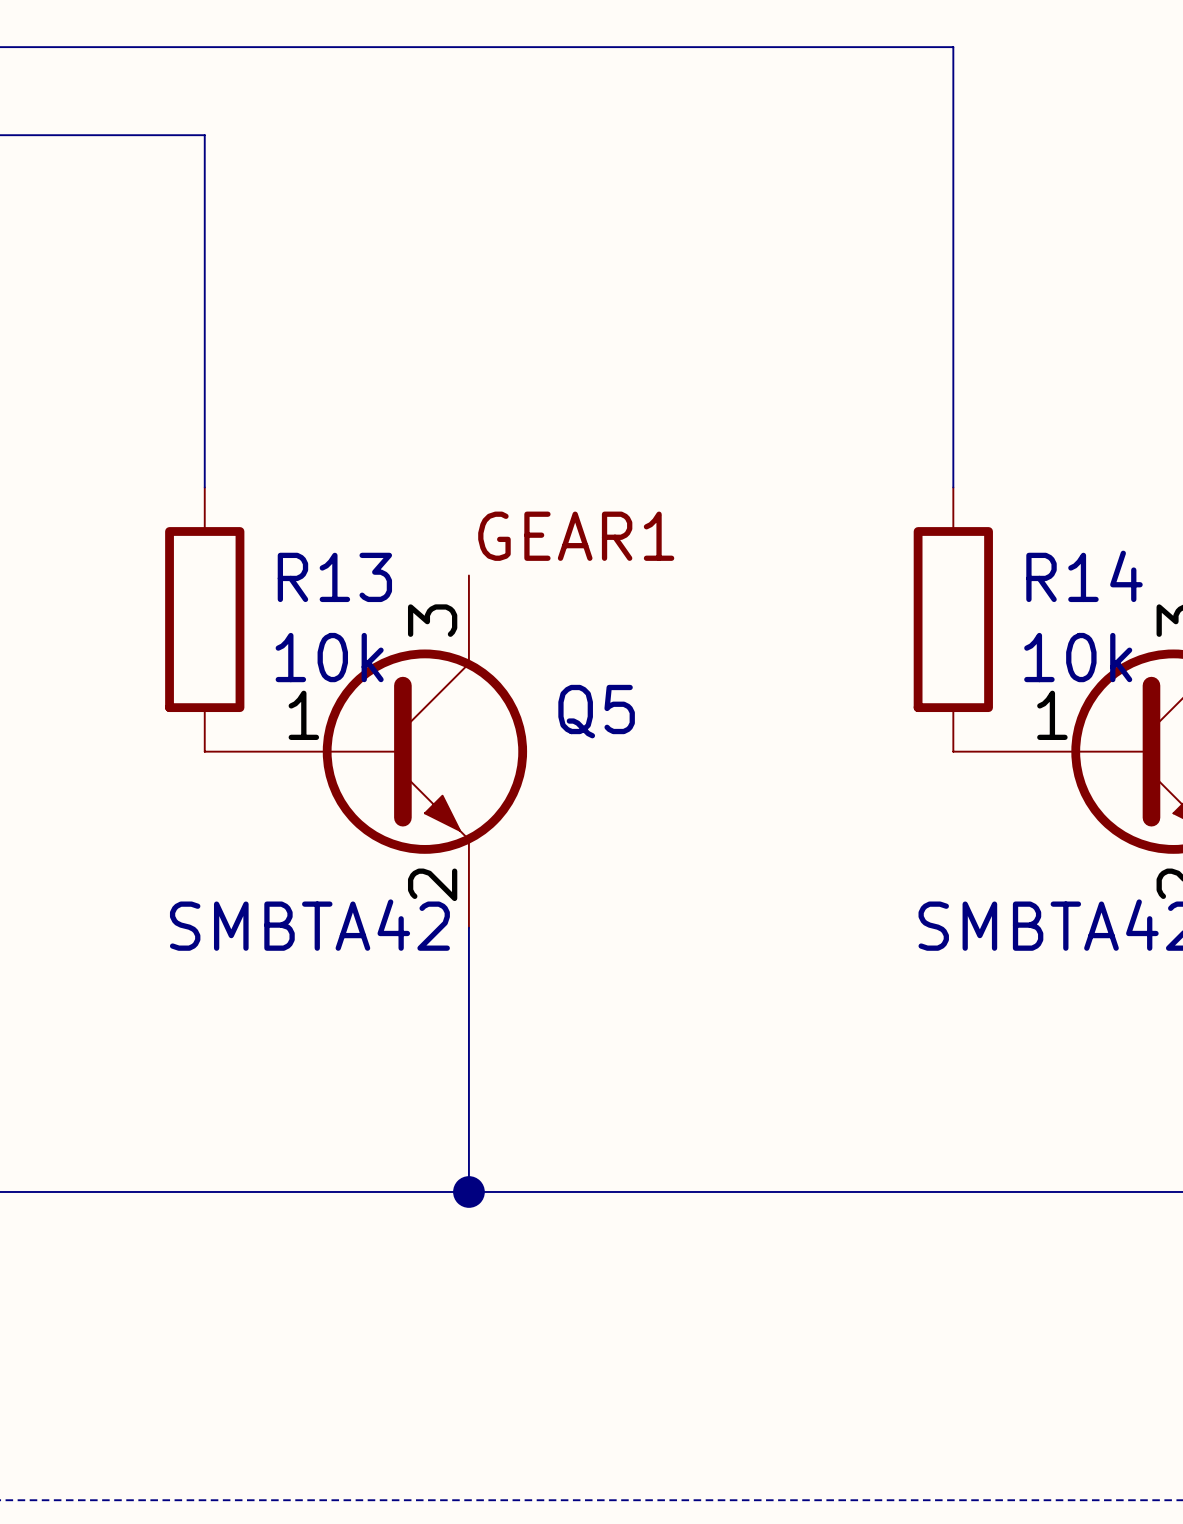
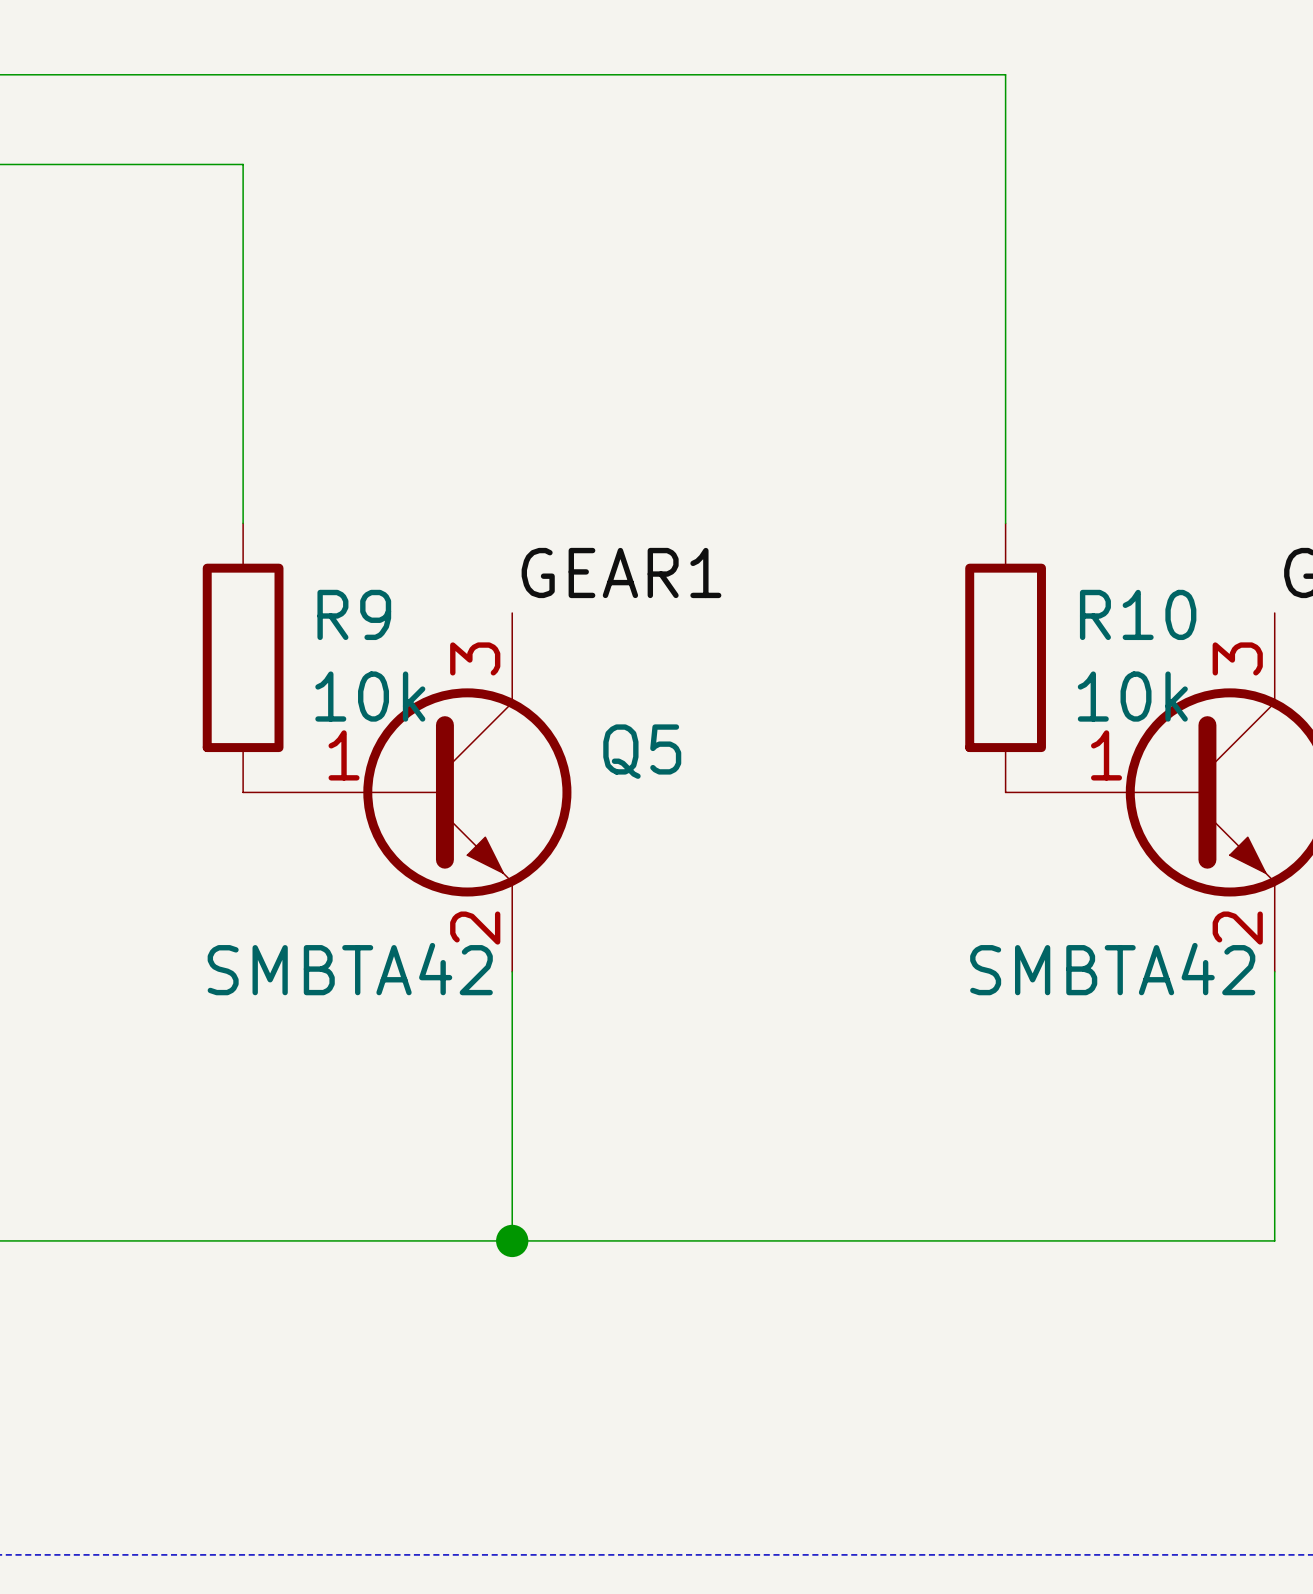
R14 name: R14 (1084, 576) -> R10 (1138, 614)
R13 name: R13 (334, 577) -> R9 (354, 614)

